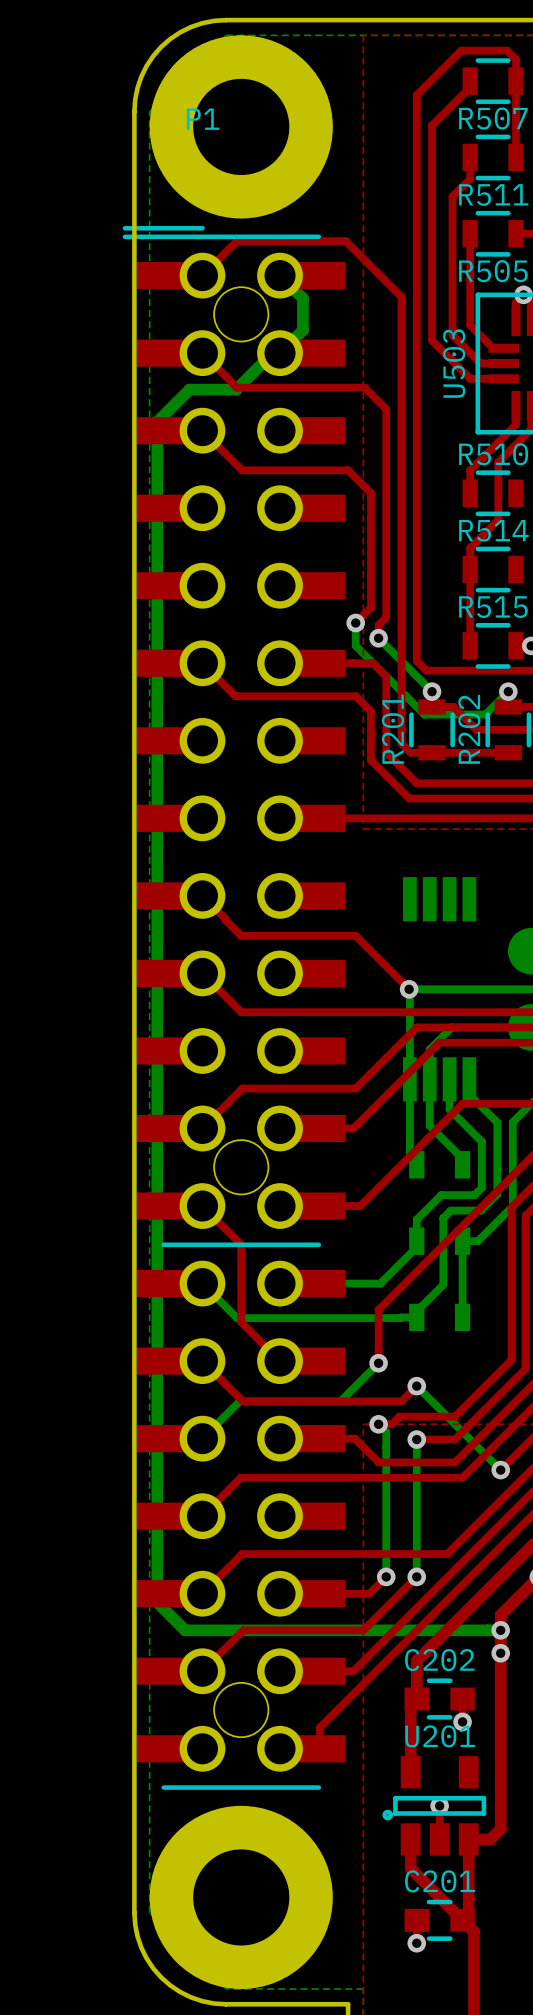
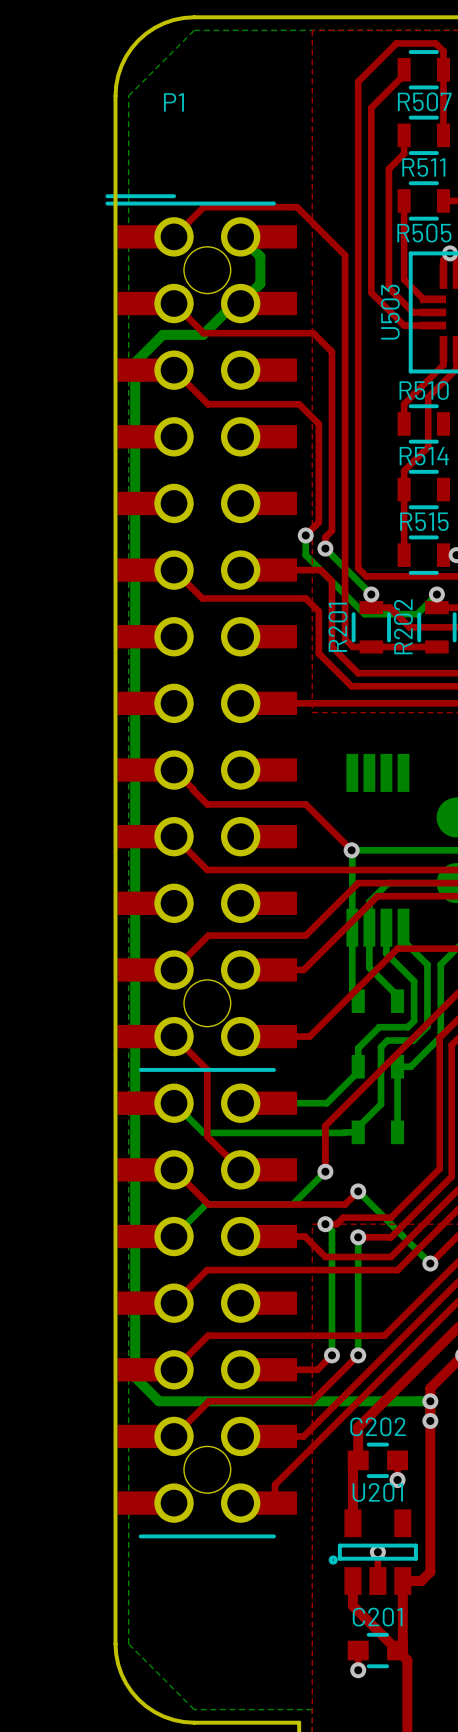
part: (241, 126) -> none
part: (241, 1897) -> none

